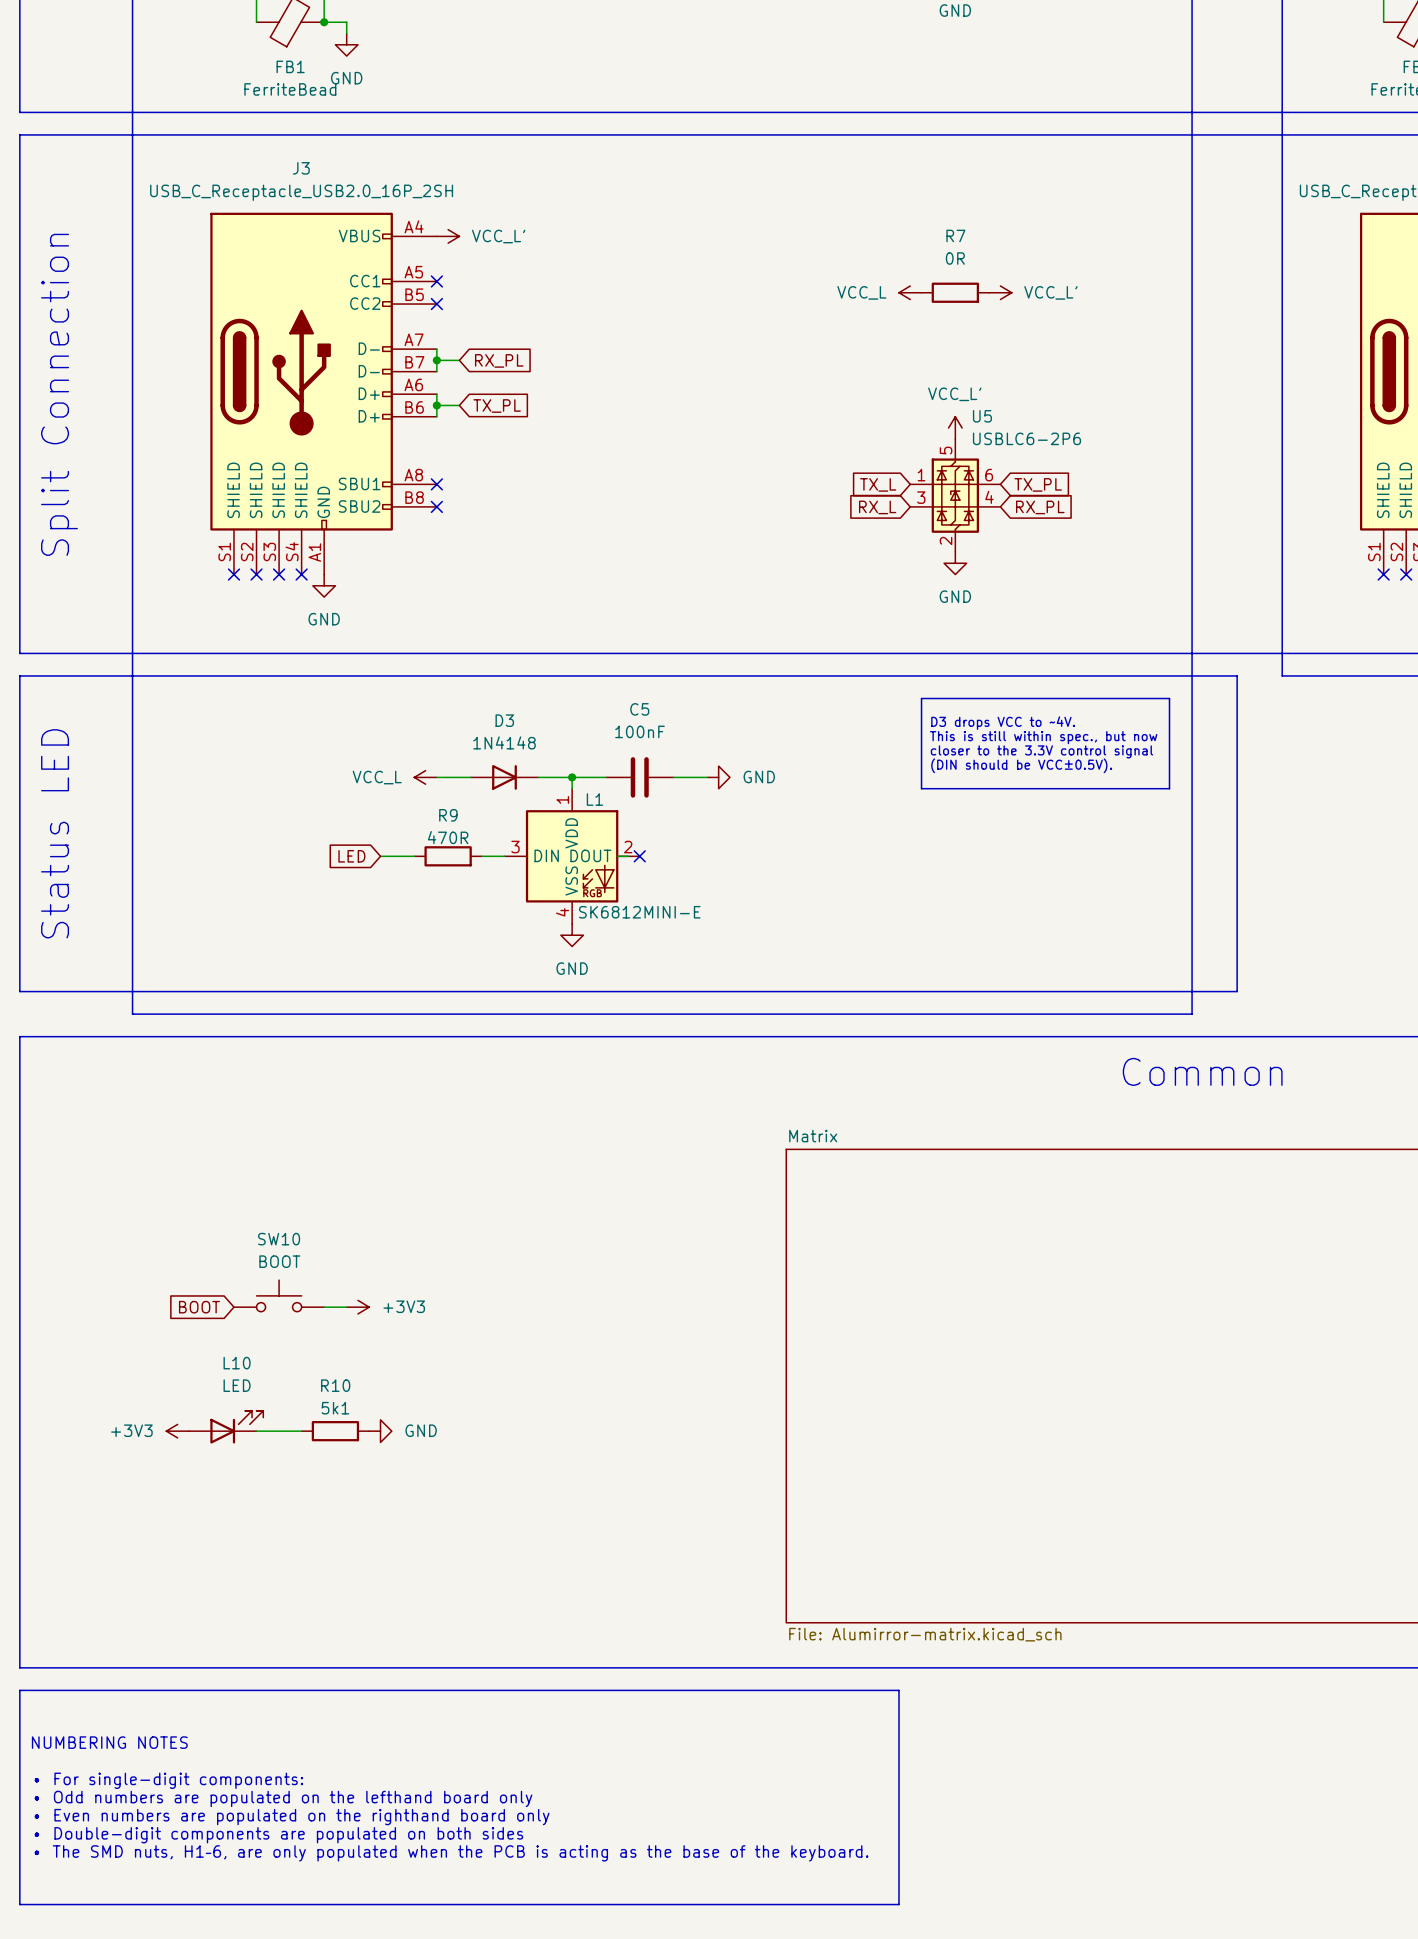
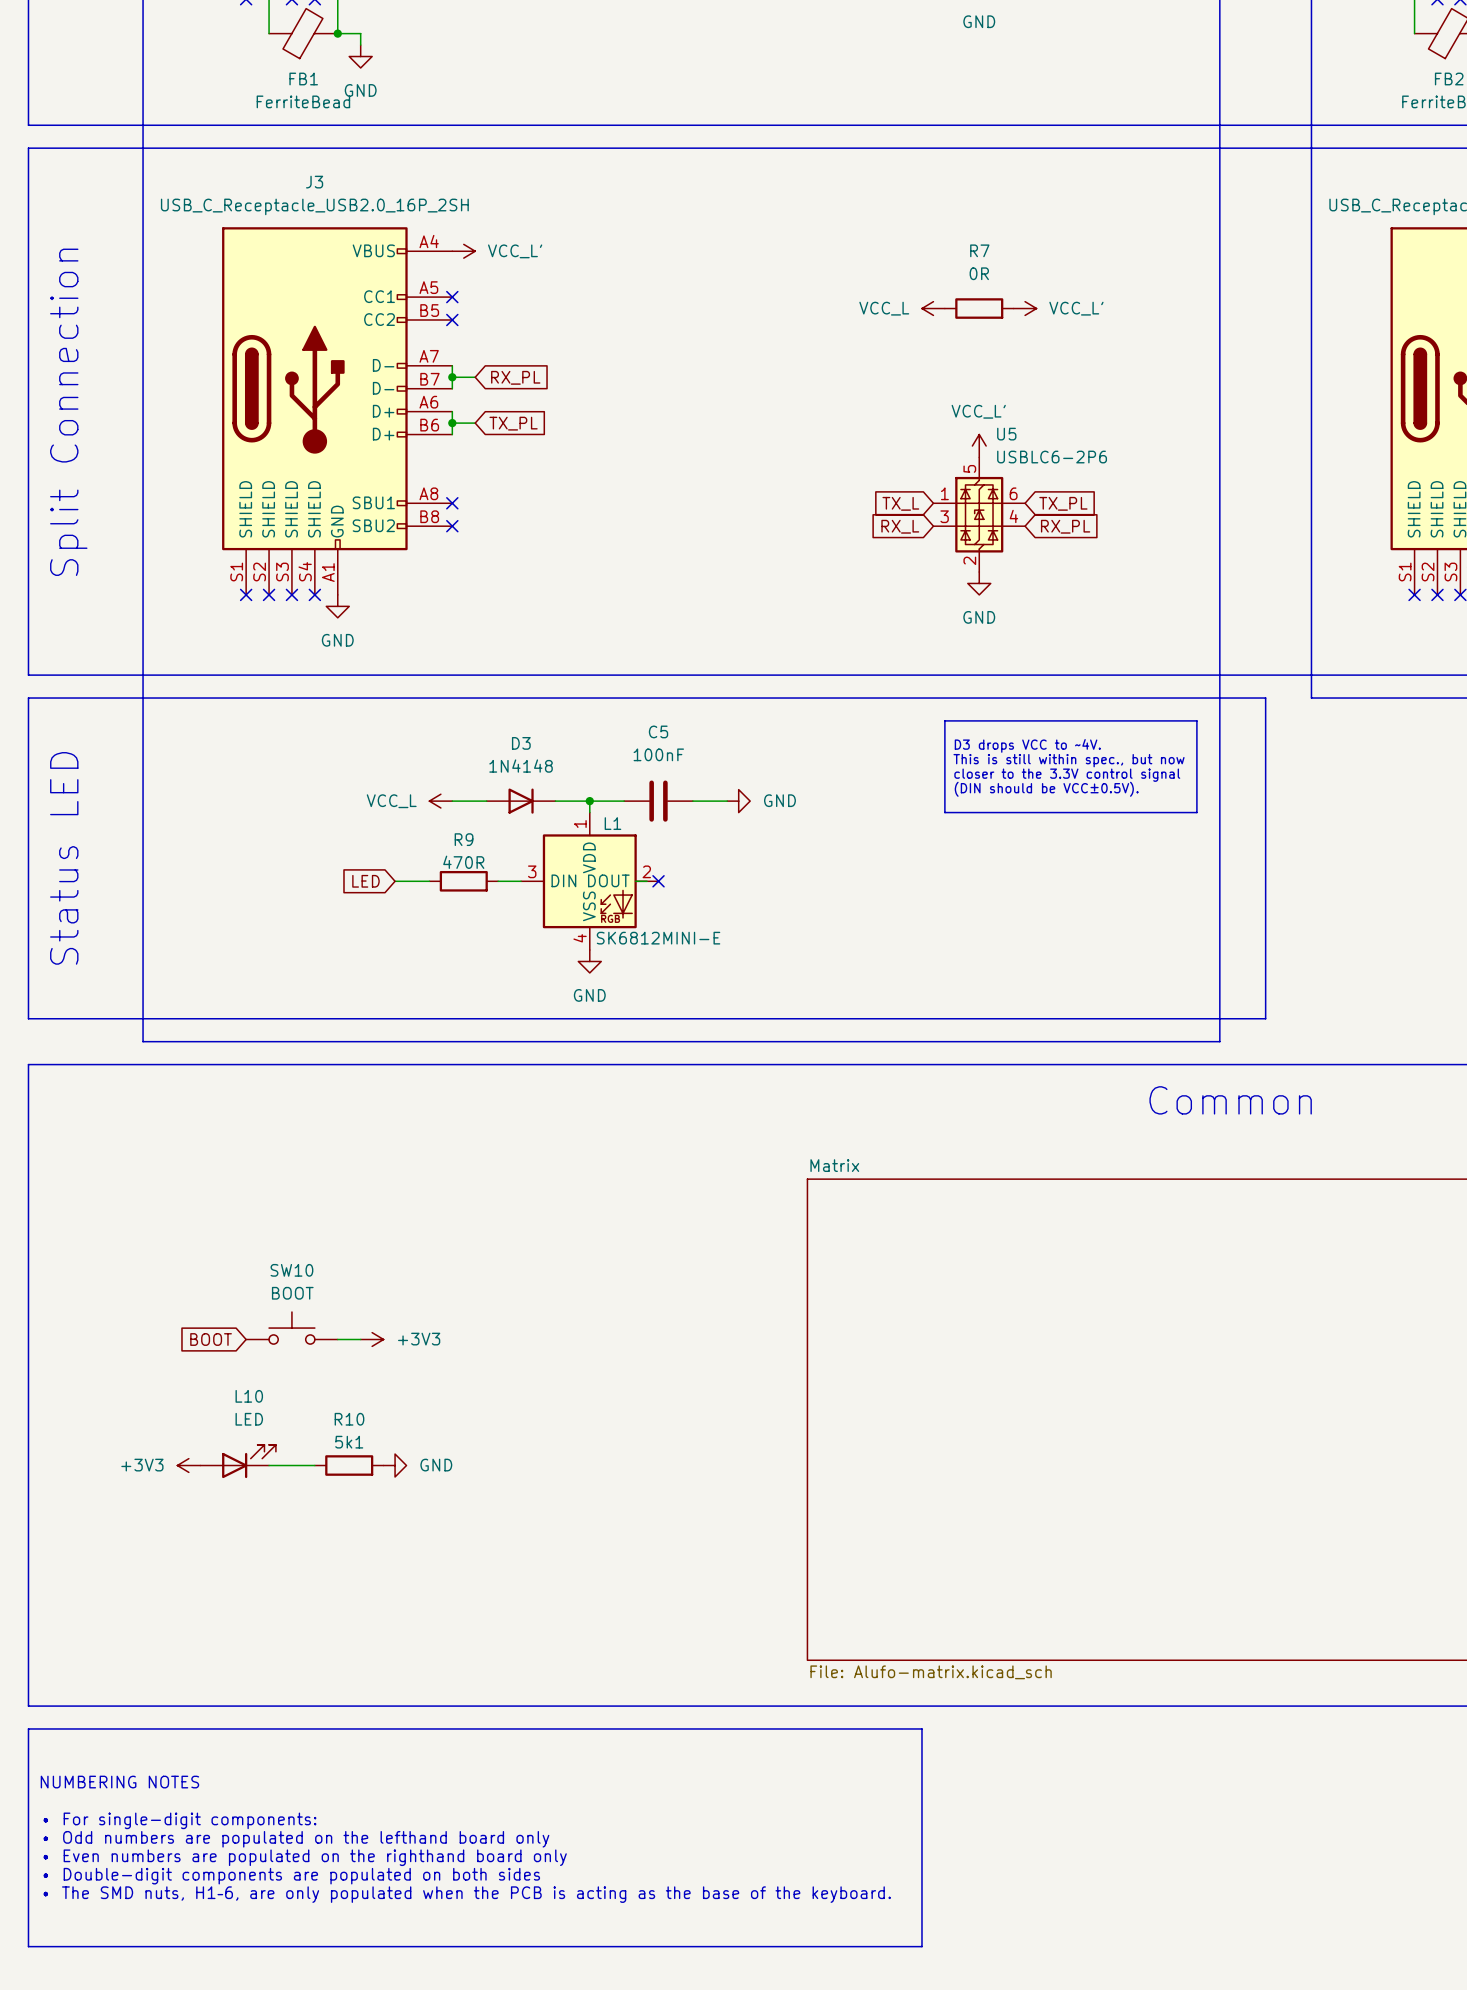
sheet Matrix value: File: Alumirror-matrix.kicad_sch (925, 1634) -> File: Alufo-matrix.kicad_sch (931, 1672)

